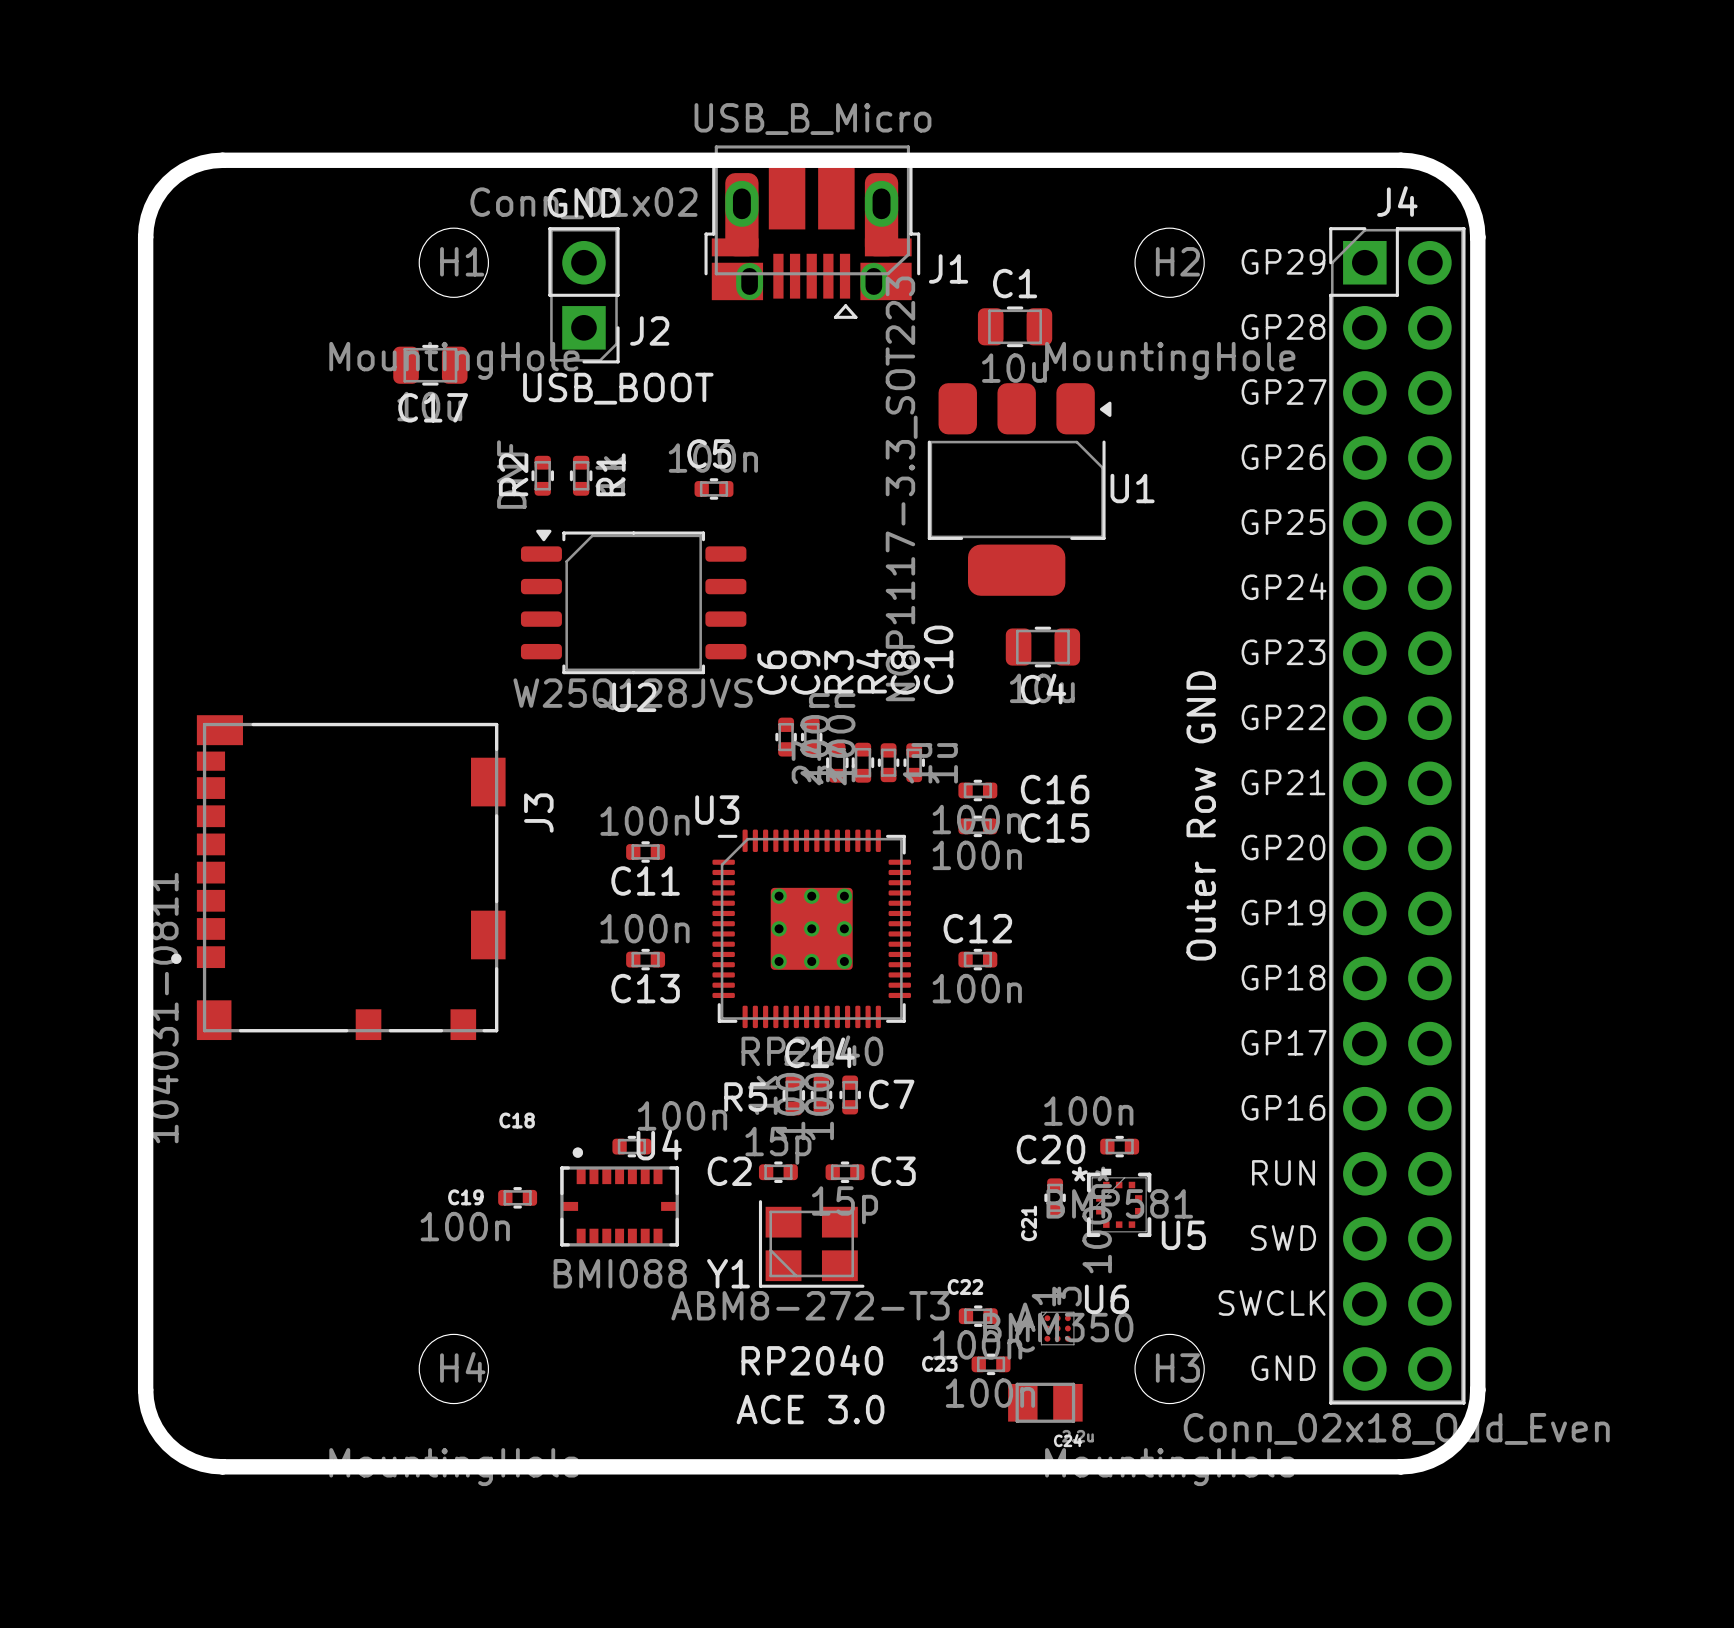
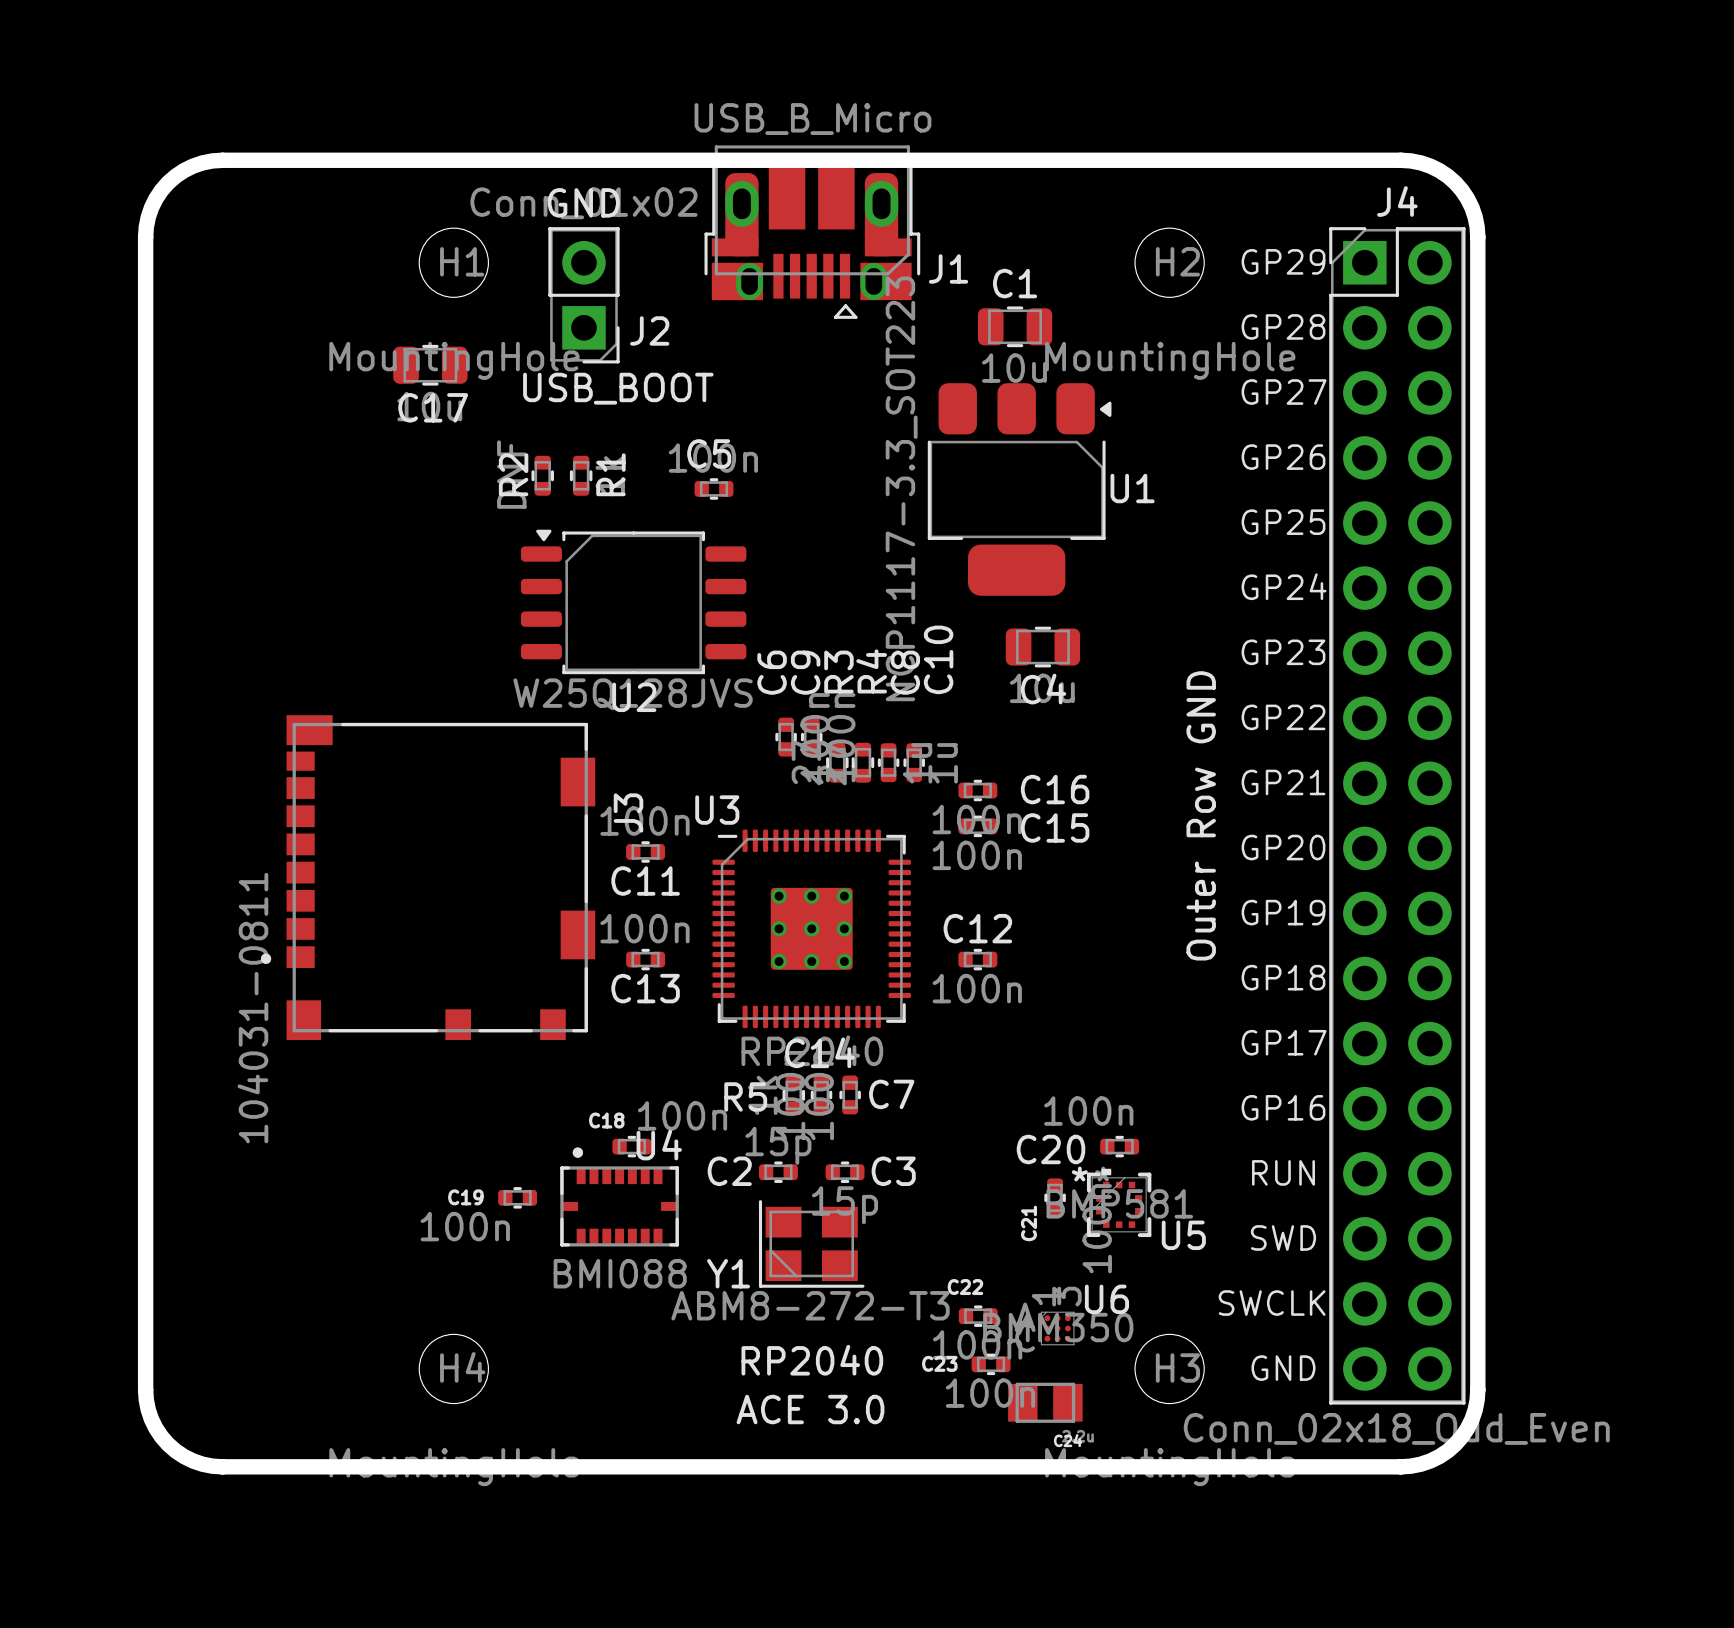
J3 position: (338, 877) -> (428, 877)
C18 name position: C18 (517, 1120) -> C18 (606, 1120)

